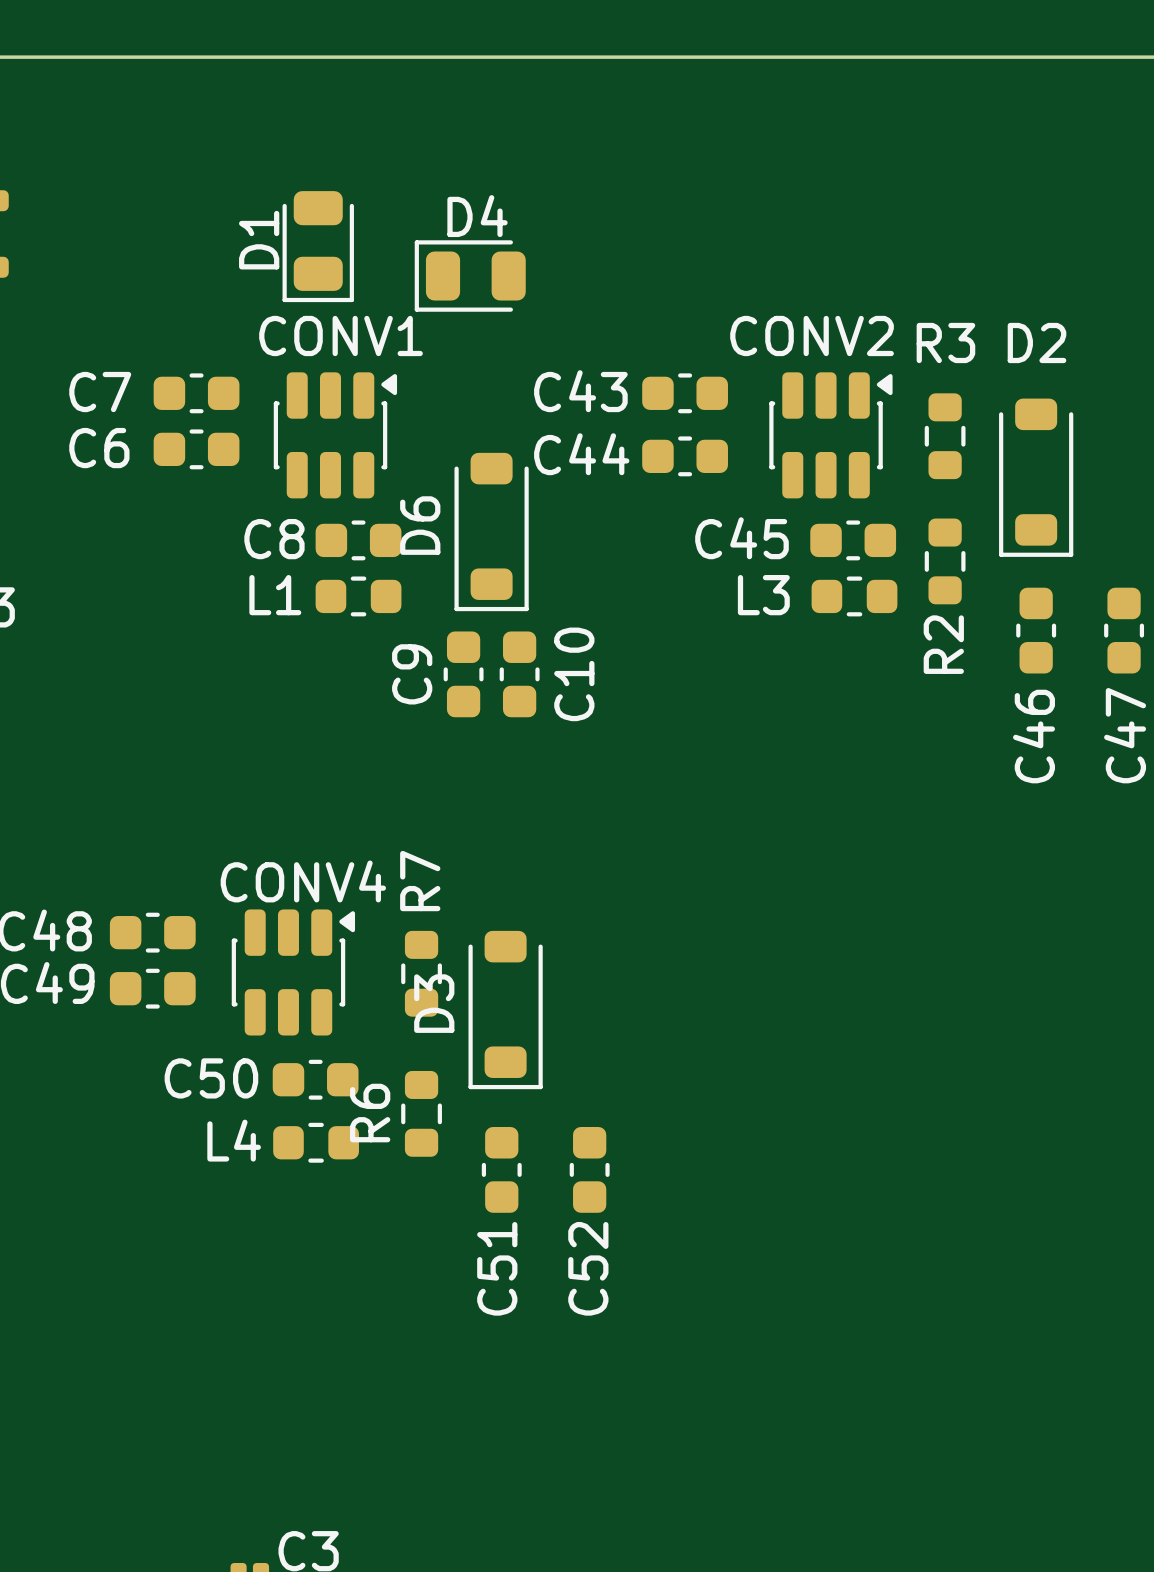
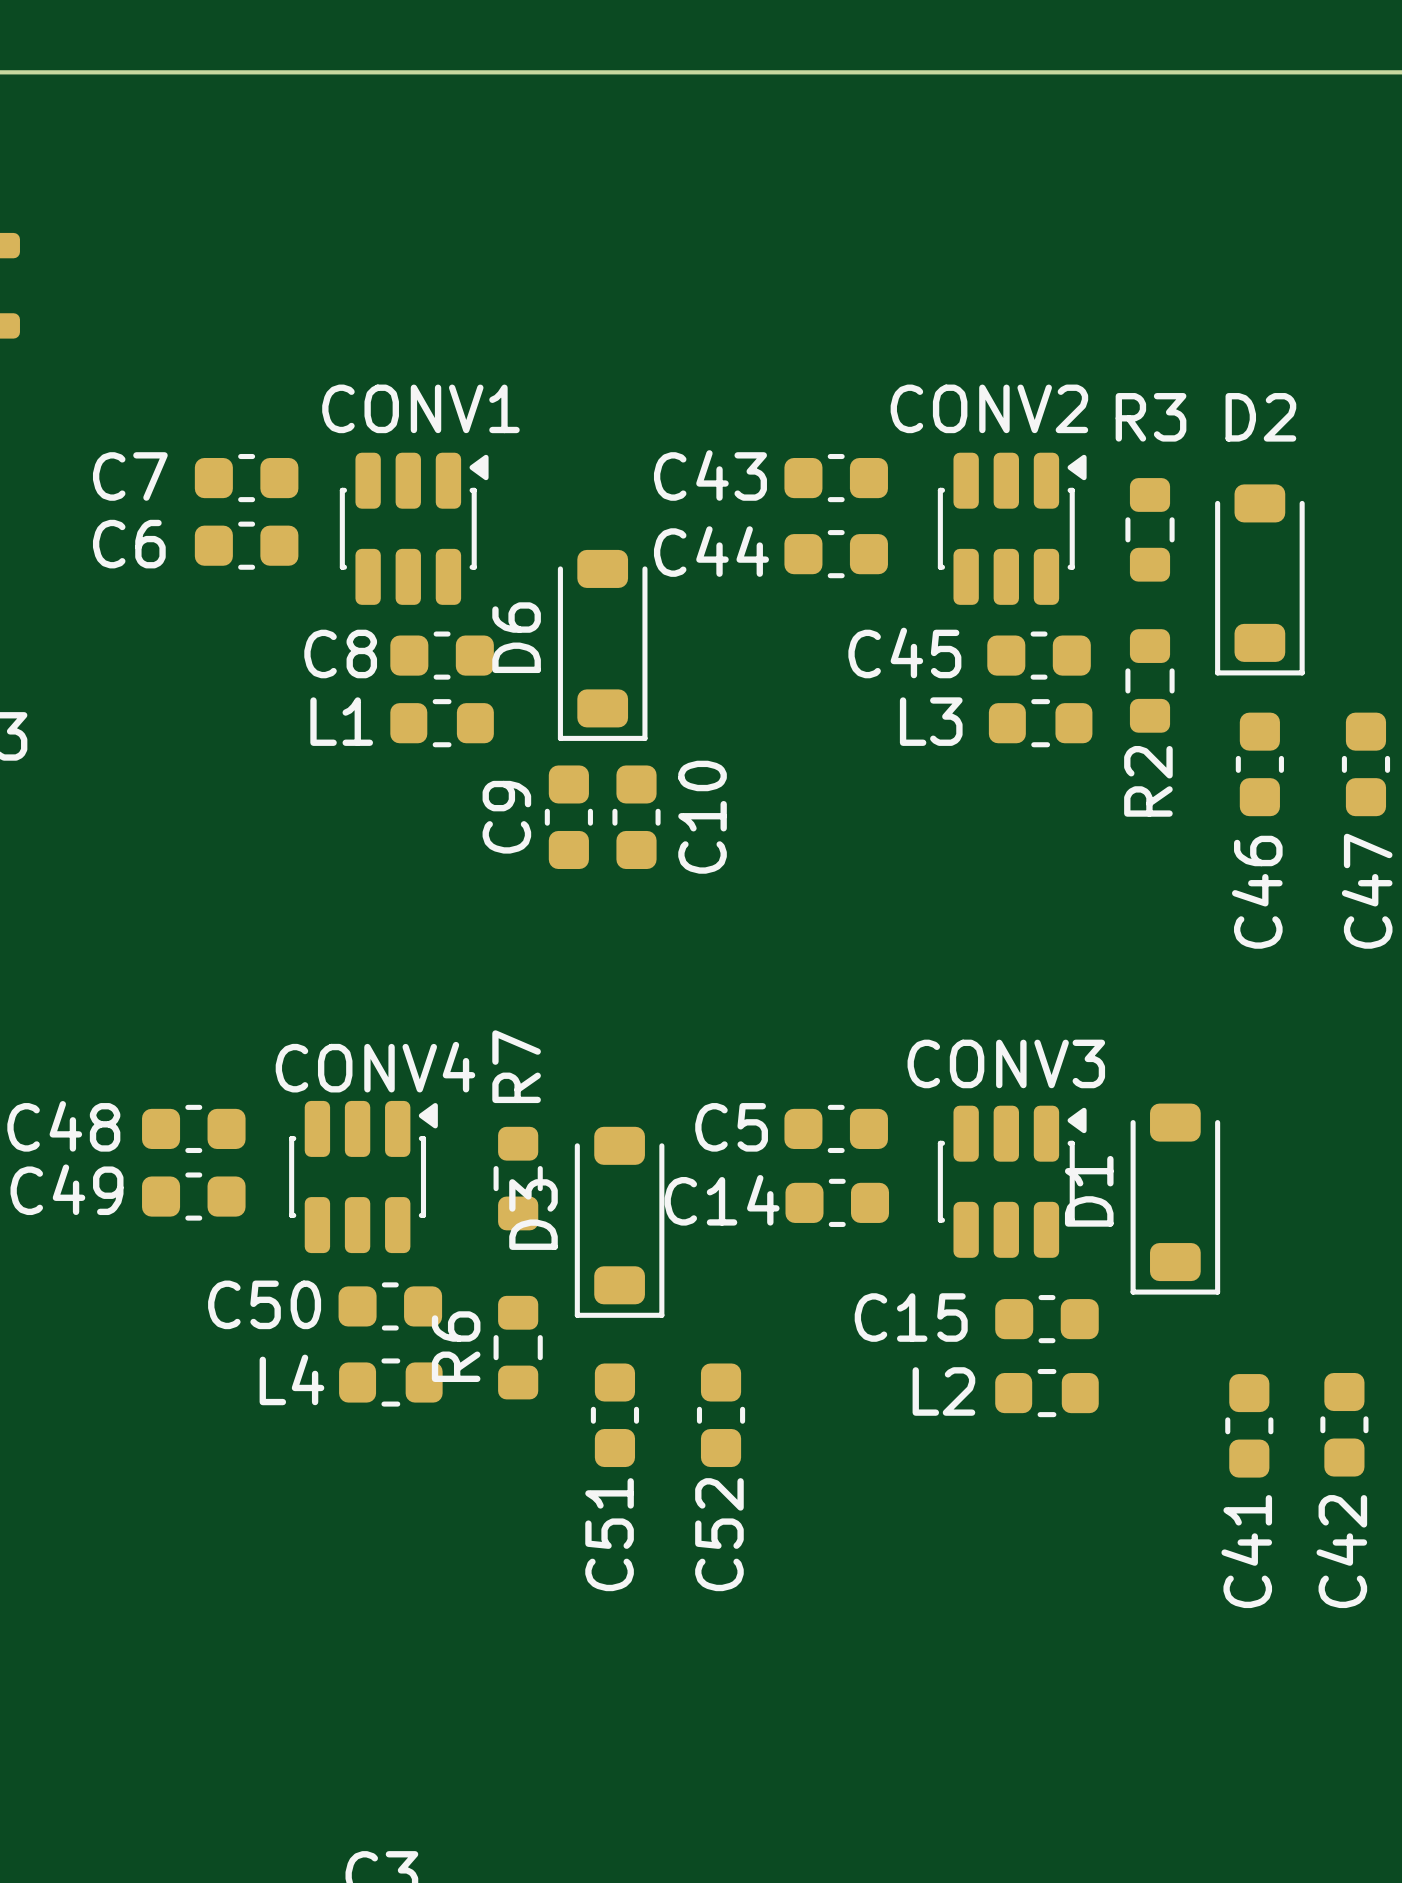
D1 footprint: [282, 191, 354, 303] -> [1130, 1103, 1221, 1295]
D4: (470, 276) -> none
C5: none -> (836, 1128)
CONV3: none -> (1012, 1181)
C14: none -> (837, 1202)
C15: none -> (1046, 1319)
L2: none -> (1046, 1393)
C42: none -> (1344, 1424)
C41: none -> (1249, 1425)

